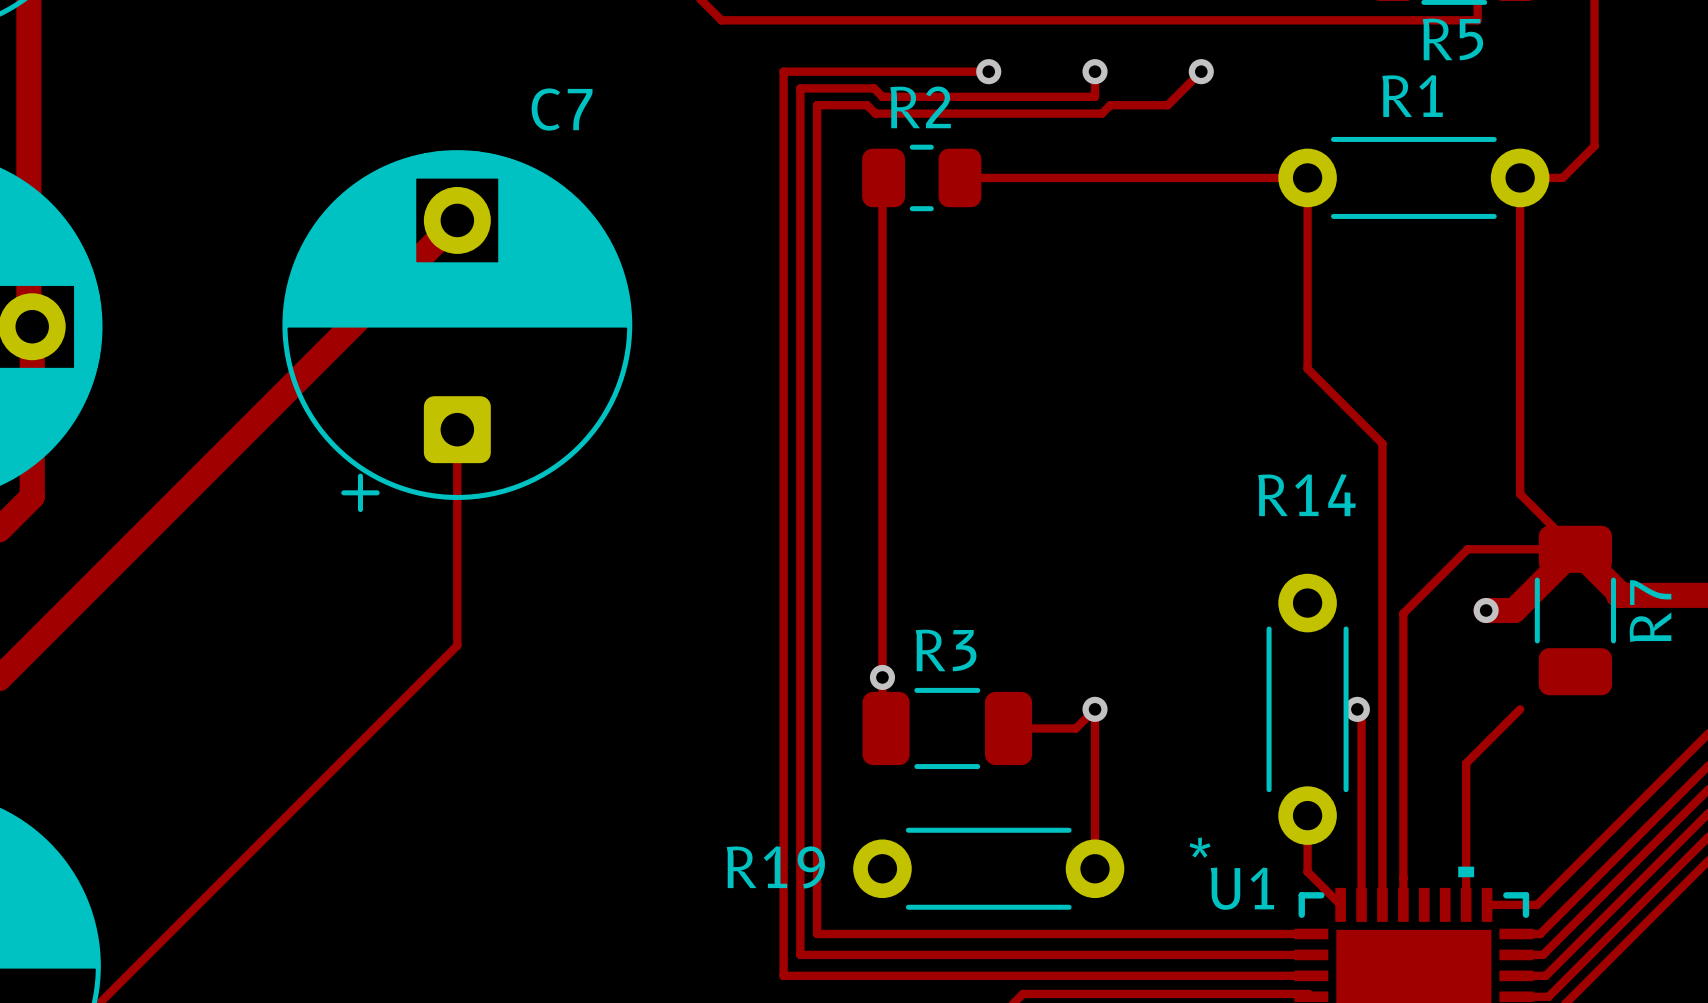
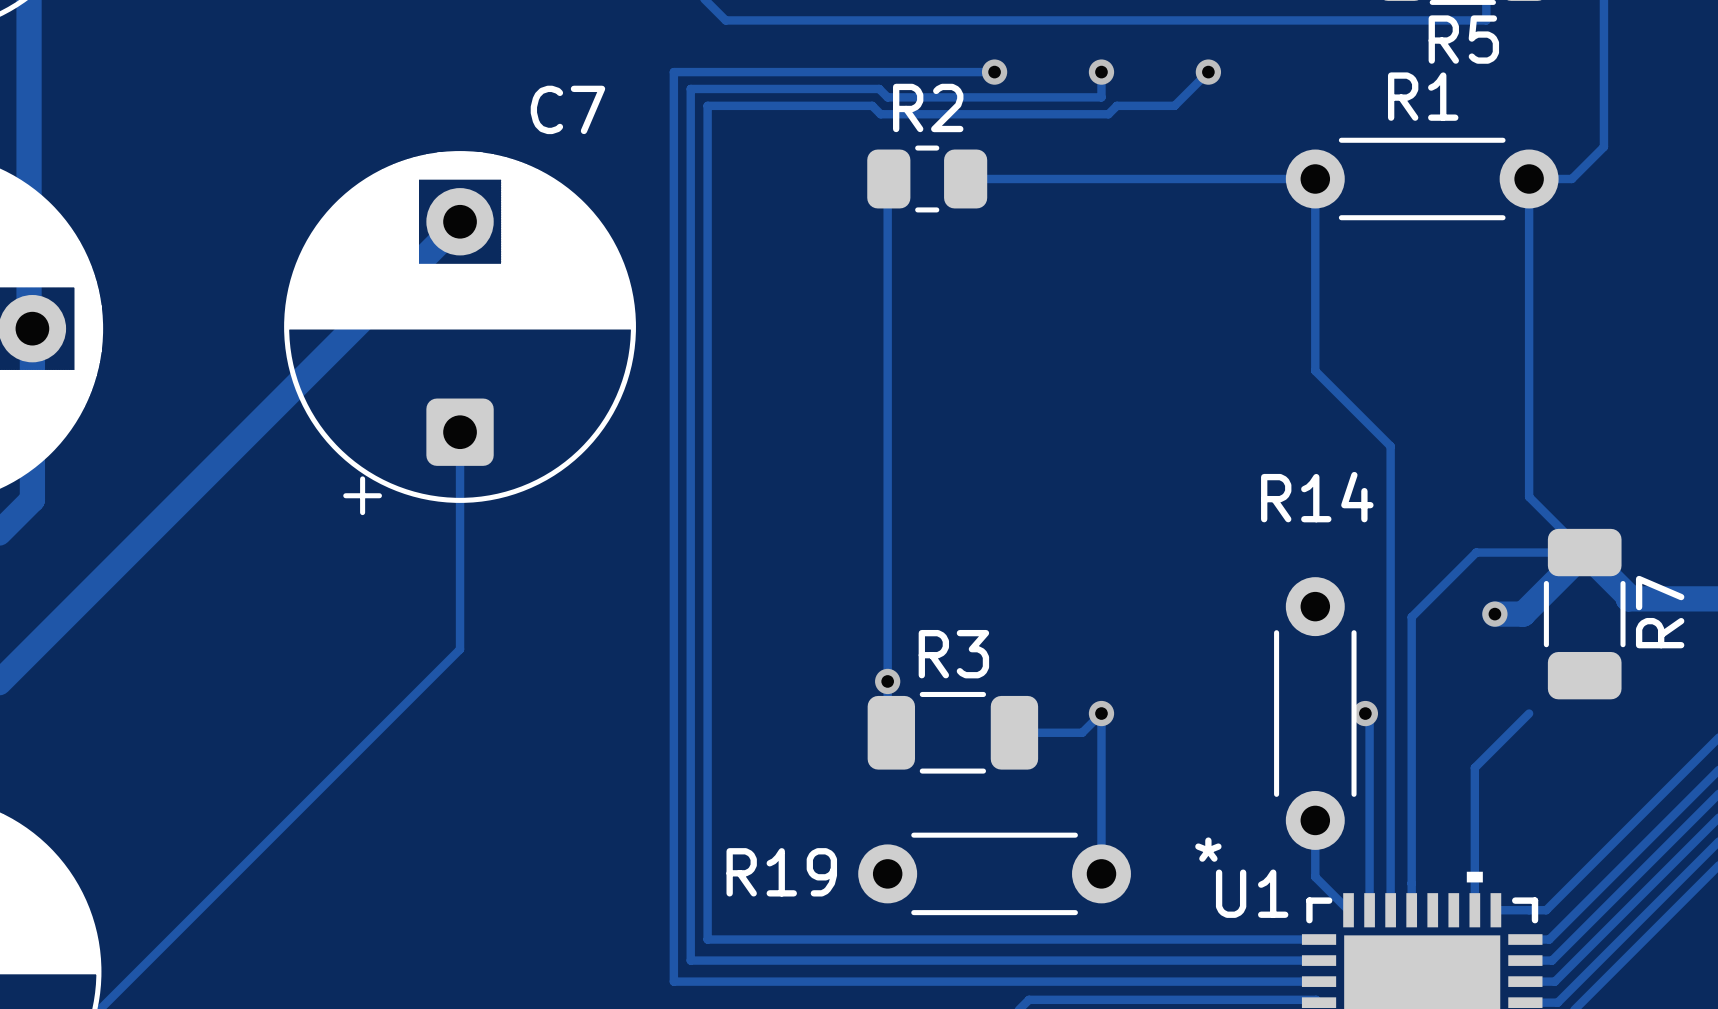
track: (783, 71) (783, 975) -> (788, 72) (673, 72) (673, 981) (788, 981)
track: (800, 88) (800, 954) -> (805, 88) (690, 88) (690, 960) (805, 960)
track: (817, 105) (817, 934) -> (822, 105) (707, 105) (707, 939) (822, 939)

